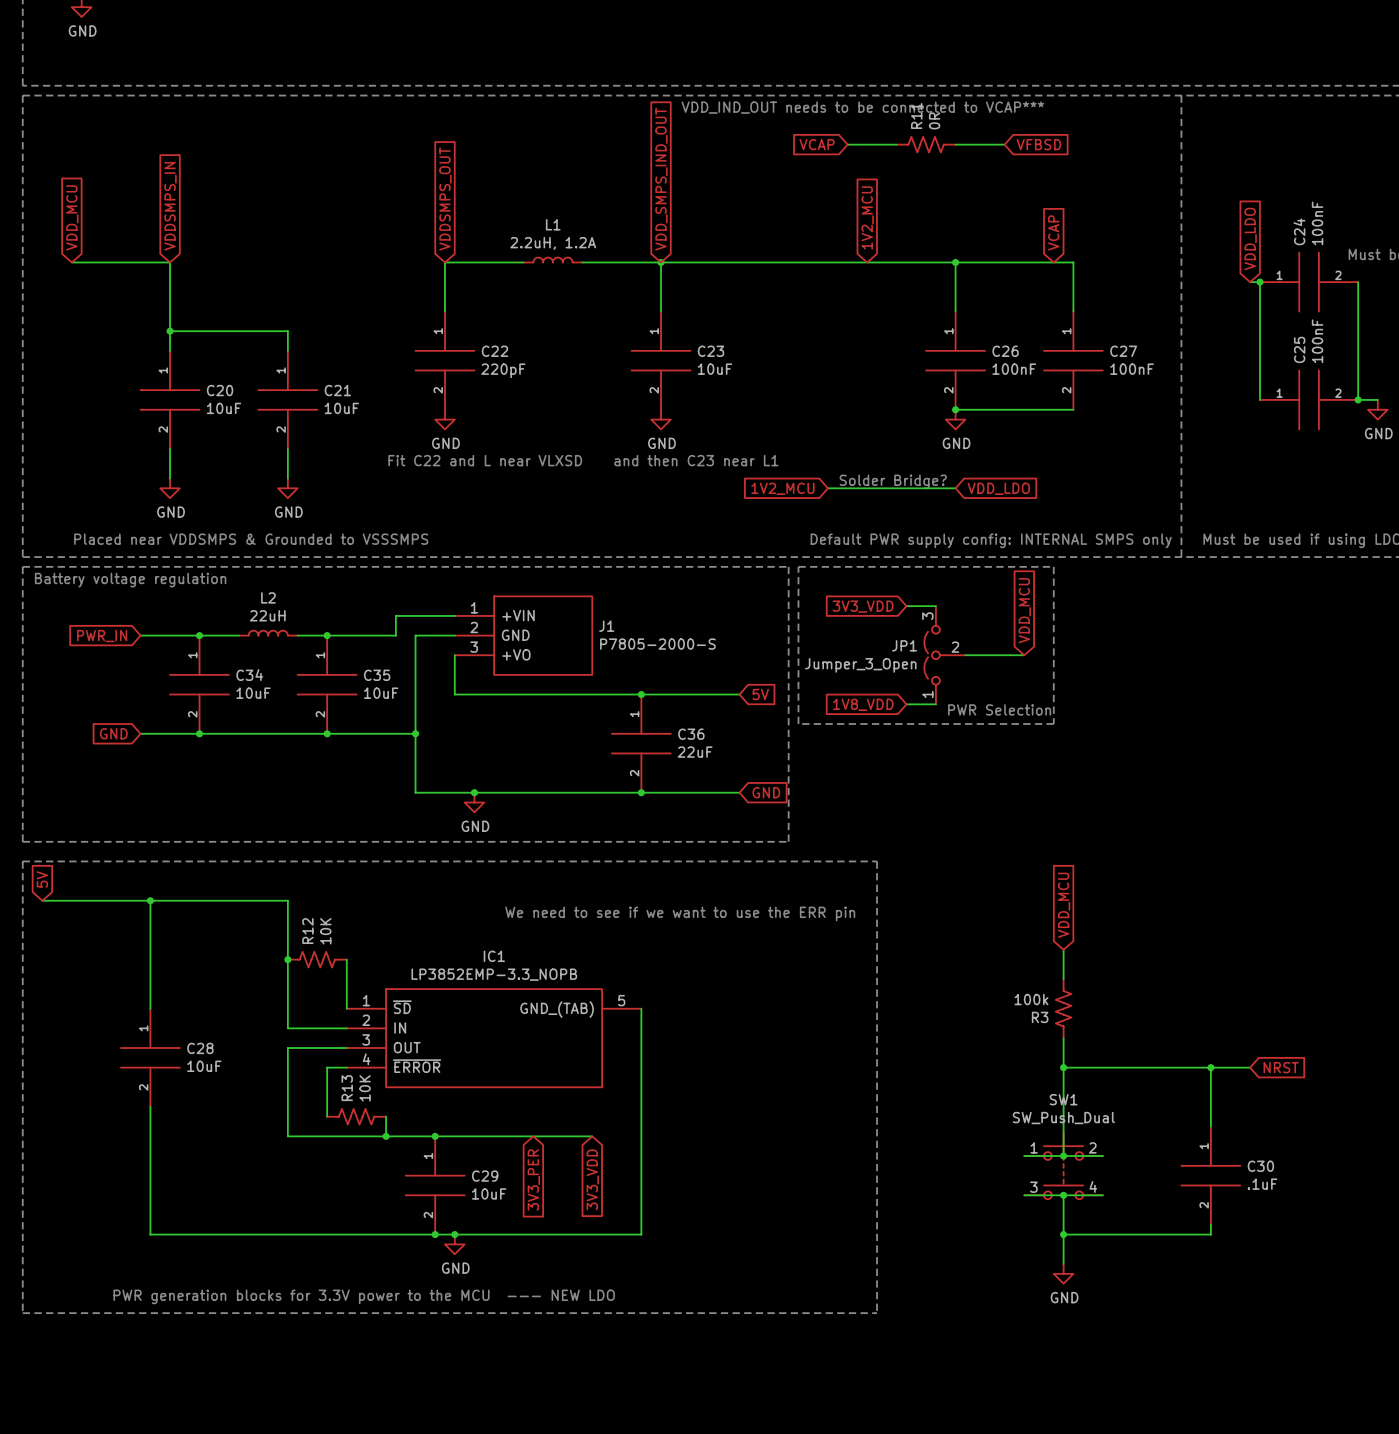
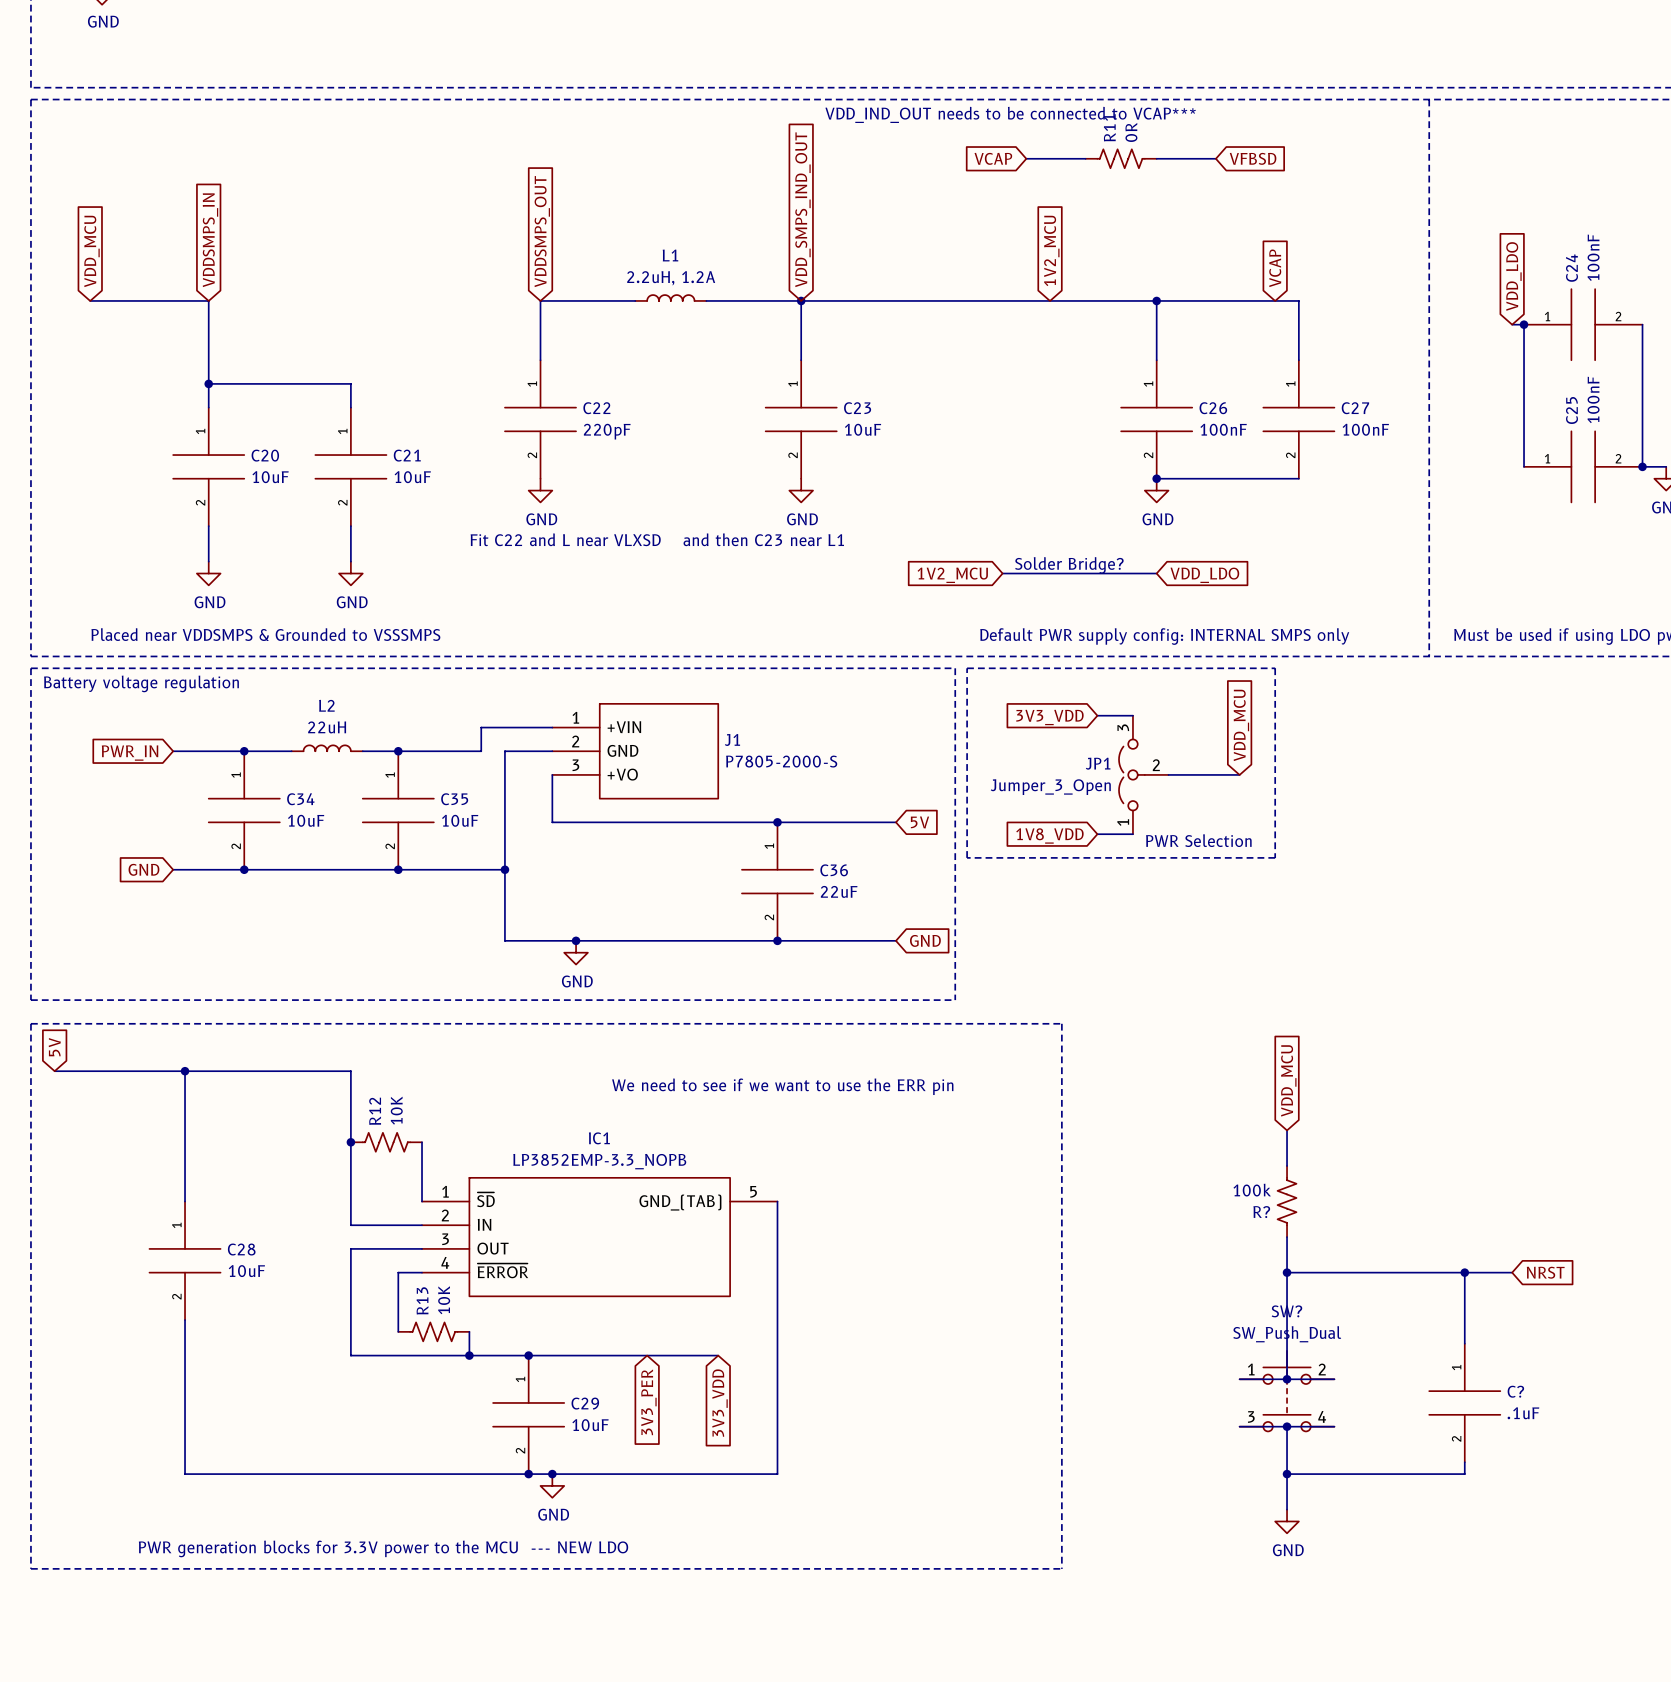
R3 name: R3 (1040, 1017) -> R? (1261, 1212)
SW1 name: SW1 (1063, 1099) -> SW? (1286, 1311)
C30 name: C30 (1260, 1166) -> C? (1515, 1391)

